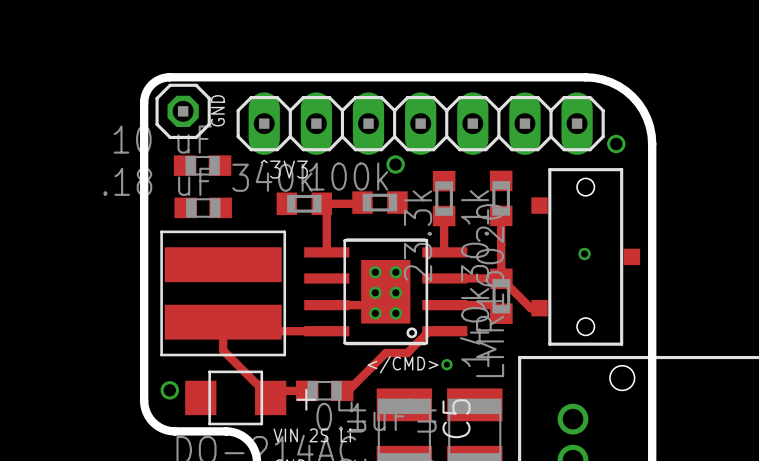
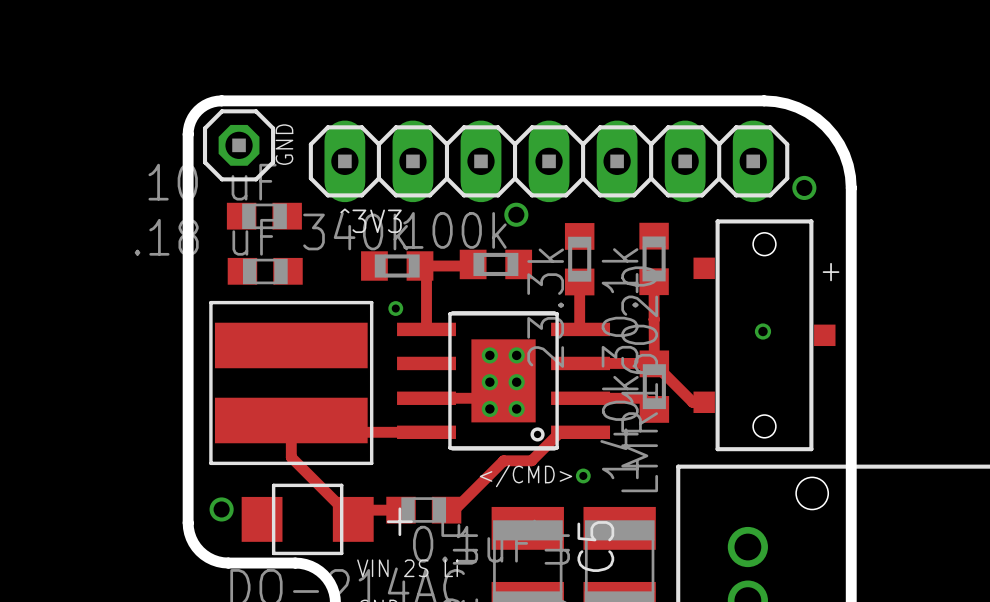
text: none -> + (831, 272)
via: none -> (395, 308)

